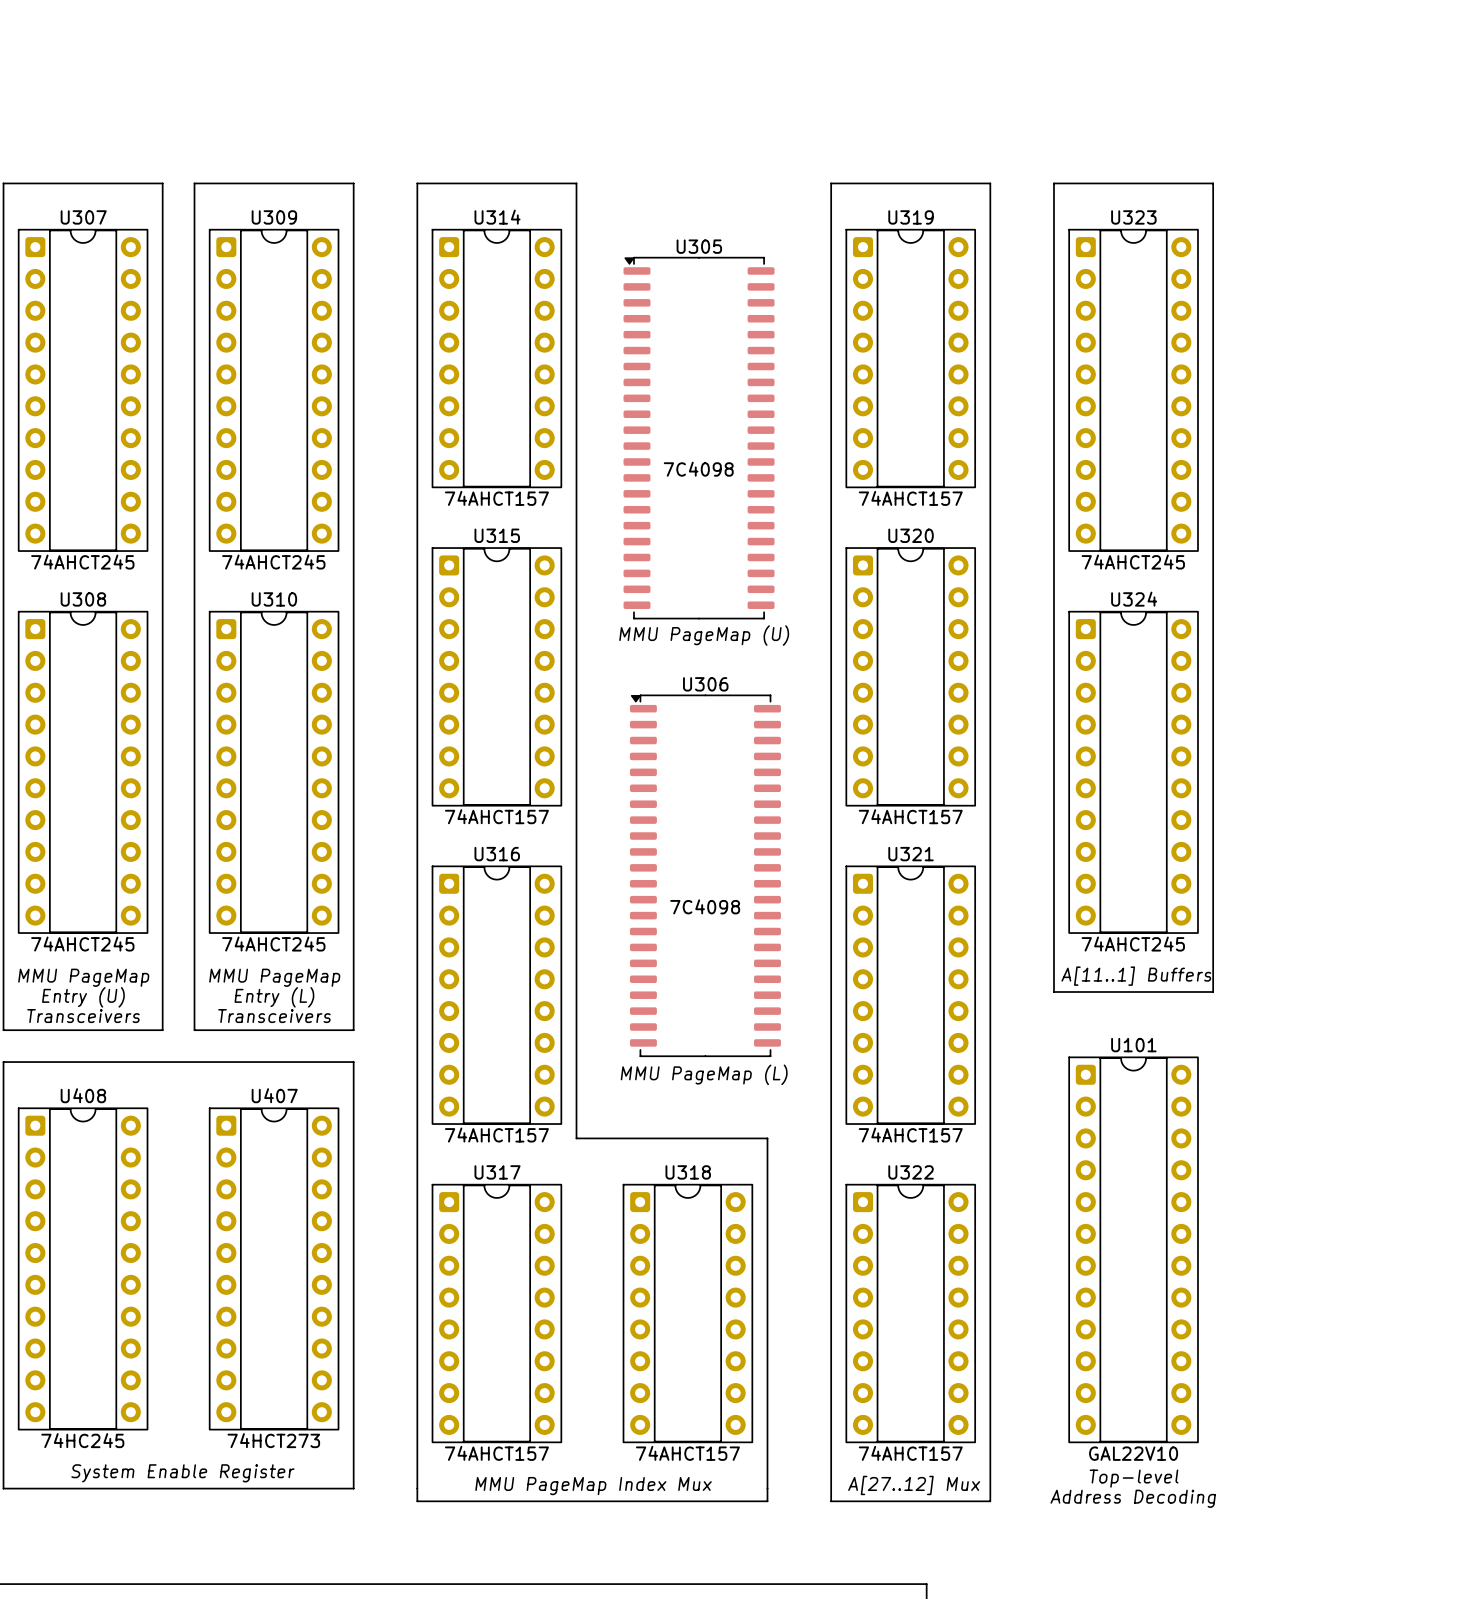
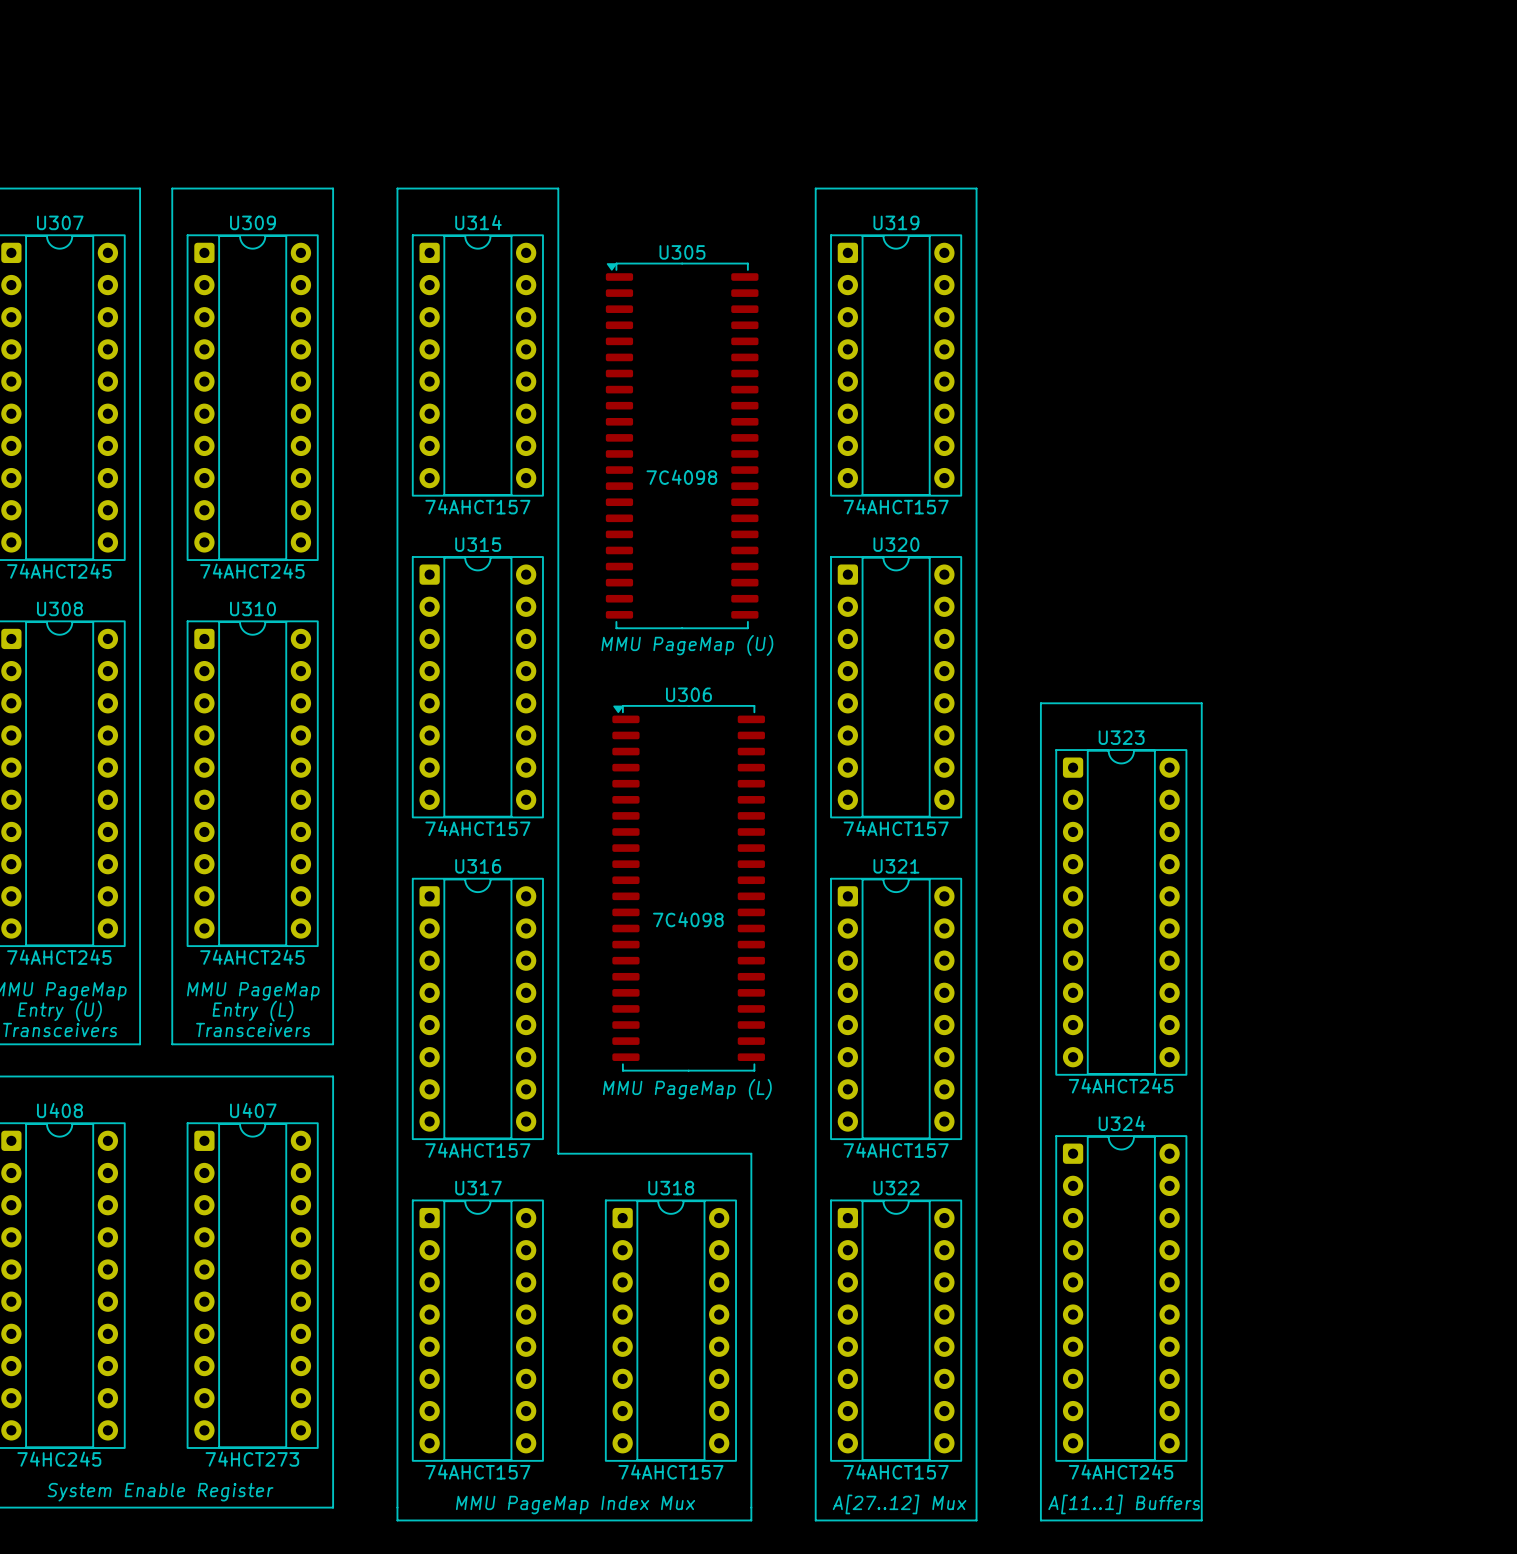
U323 position: (1133, 390) -> (1121, 912)
line: (1053, 692) (1053, 183) (1213, 183) (1213, 692) -> (1040, 703) (1201, 703)
U324 position: (1133, 772) -> (1121, 1298)
text: A[11..1] Buffers (1136, 976) -> none
line: (1053, 992) (1213, 992) -> (1040, 1005) (1040, 1520) (1201, 1520) (1201, 1005)
U101: GAL22V10 (1133, 1249) -> none
text: Top-level (1134, 1478) -> none
text: none -> A[11..1] Buffers (1124, 1504)
text: Address Decoding (1133, 1498) -> none

